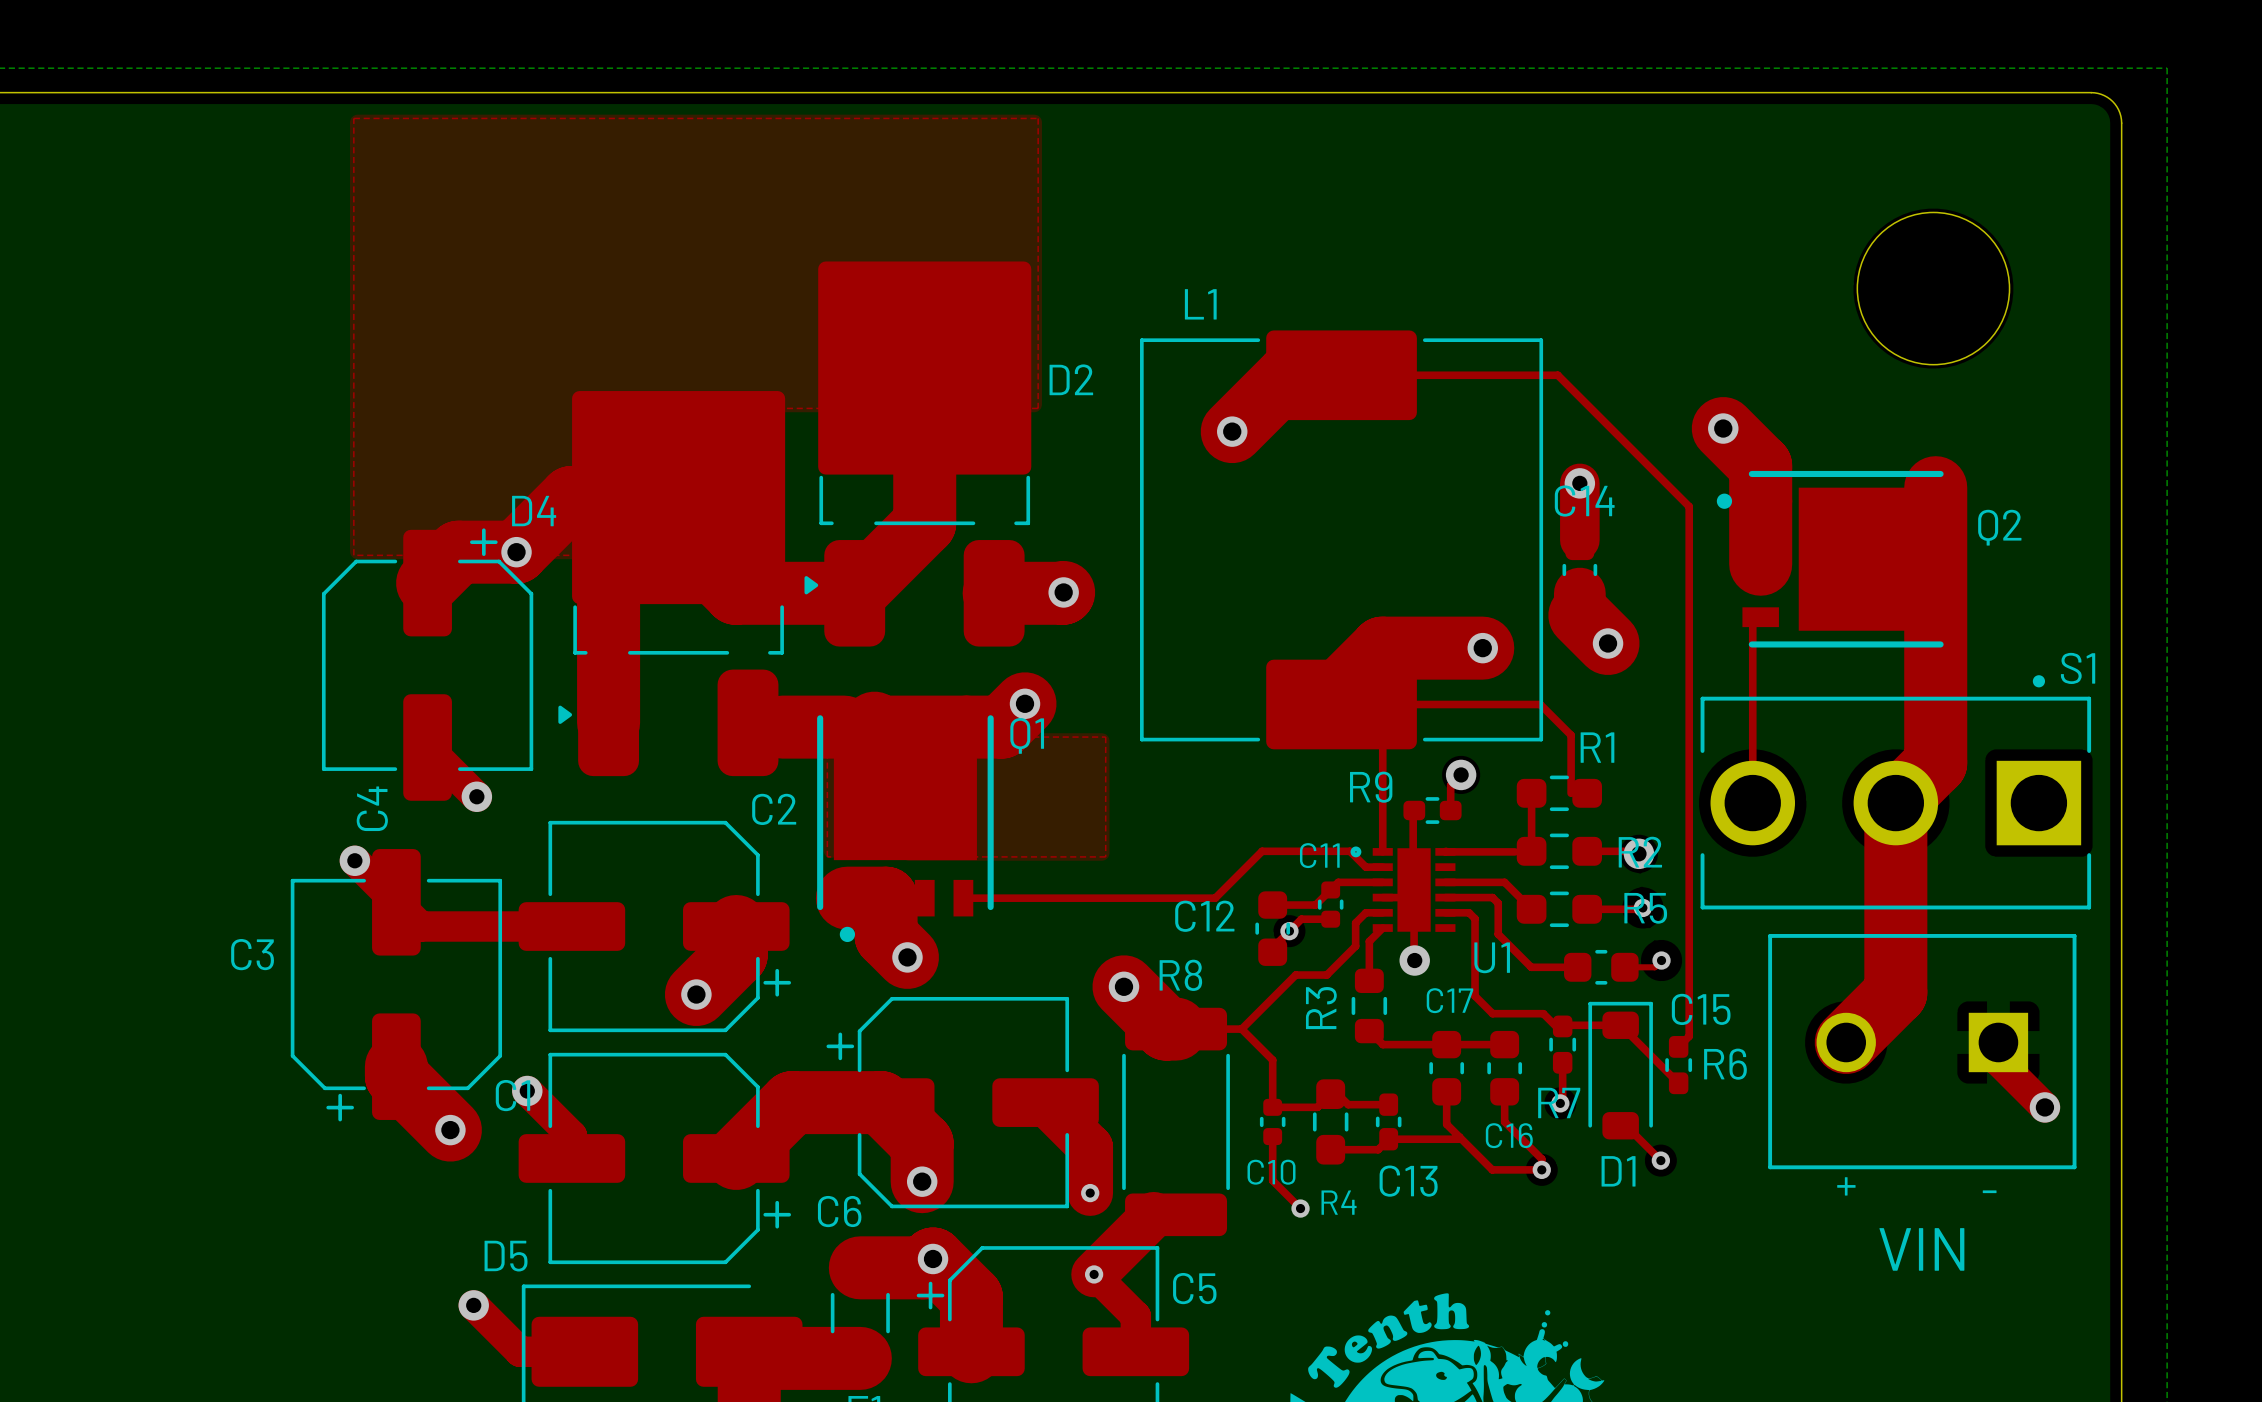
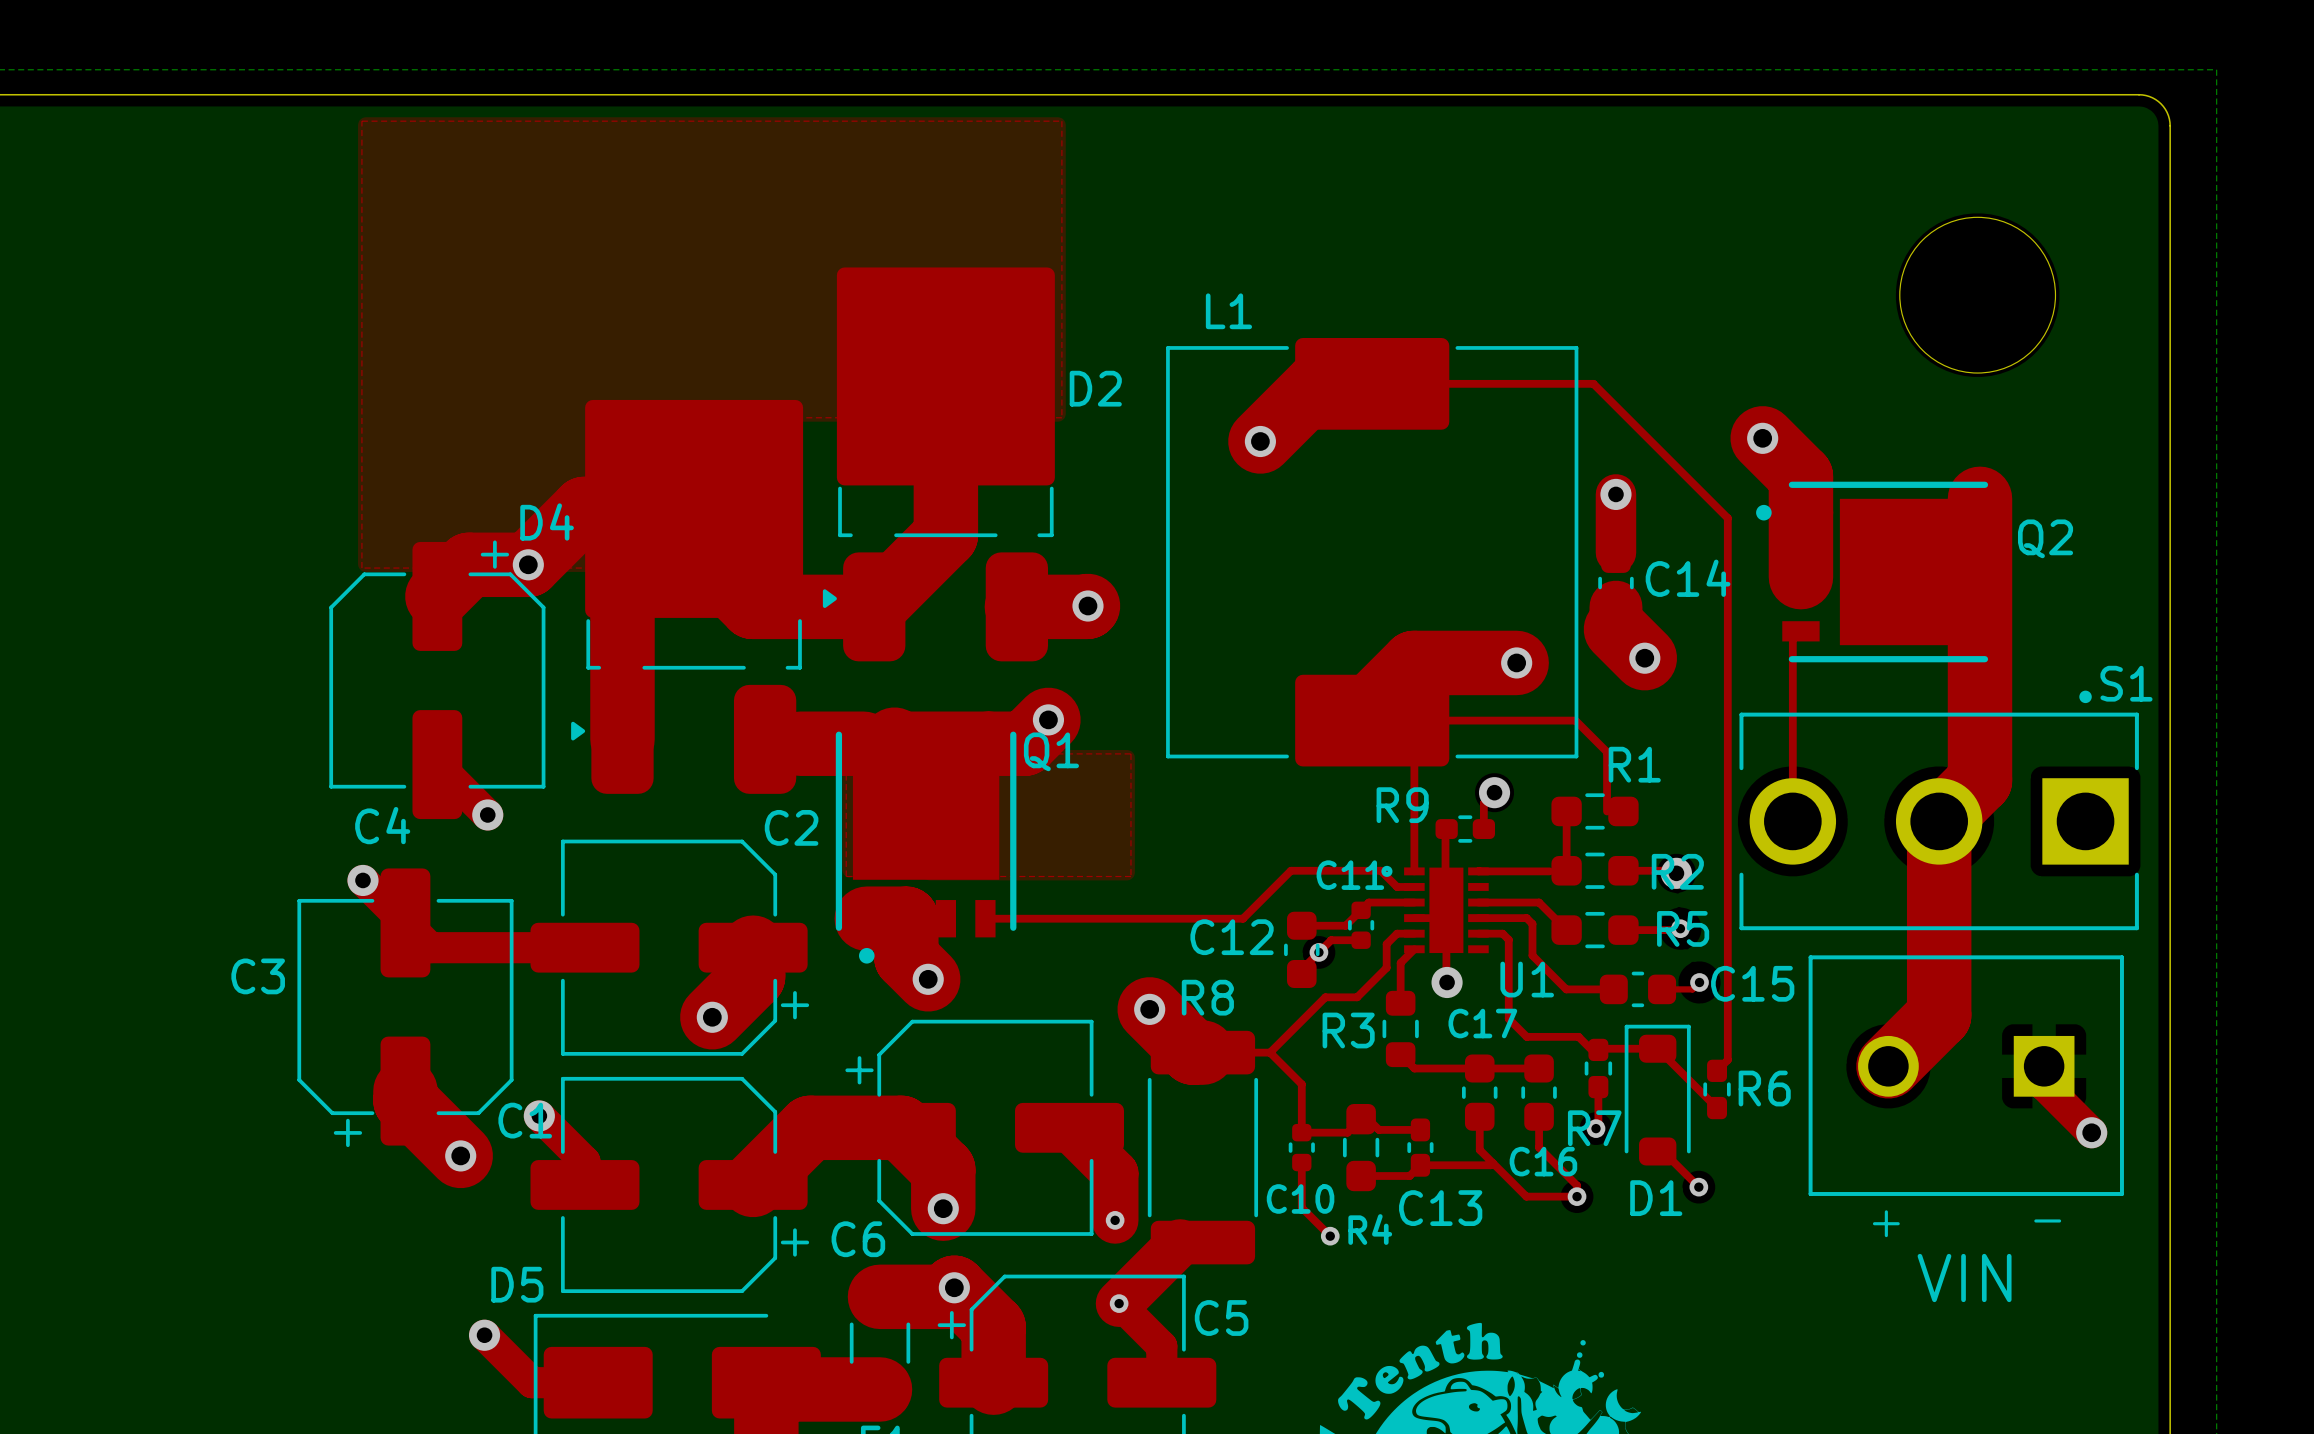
C14 name position: C14 (1584, 501) -> C14 (1688, 578)
C4 name rotation: 0° (372, 808) -> 90° clockwise (382, 825)
R3 name rotation: 0° (1321, 1008) -> 90° clockwise (1348, 1030)
C15 name position: C15 (1701, 1009) -> C15 (1752, 983)

